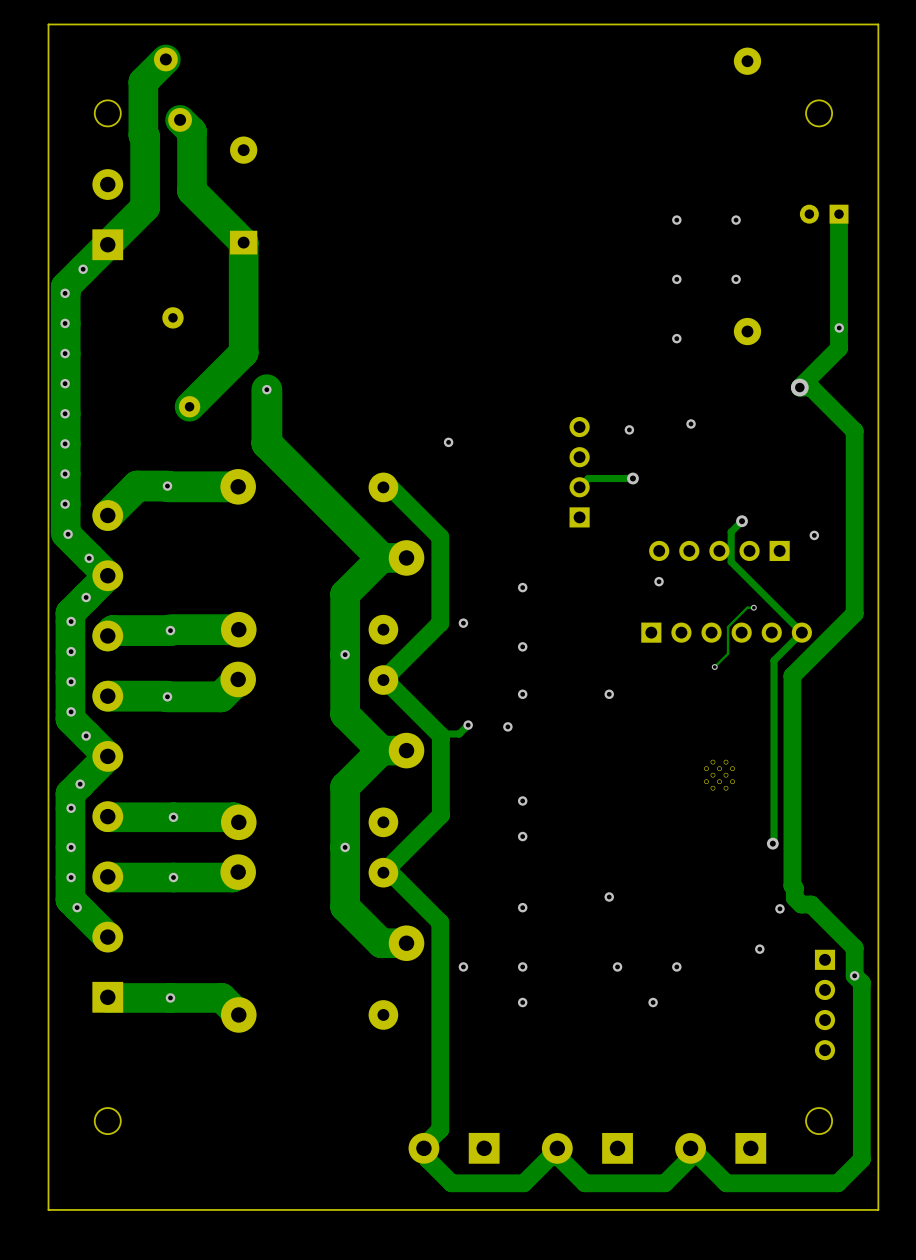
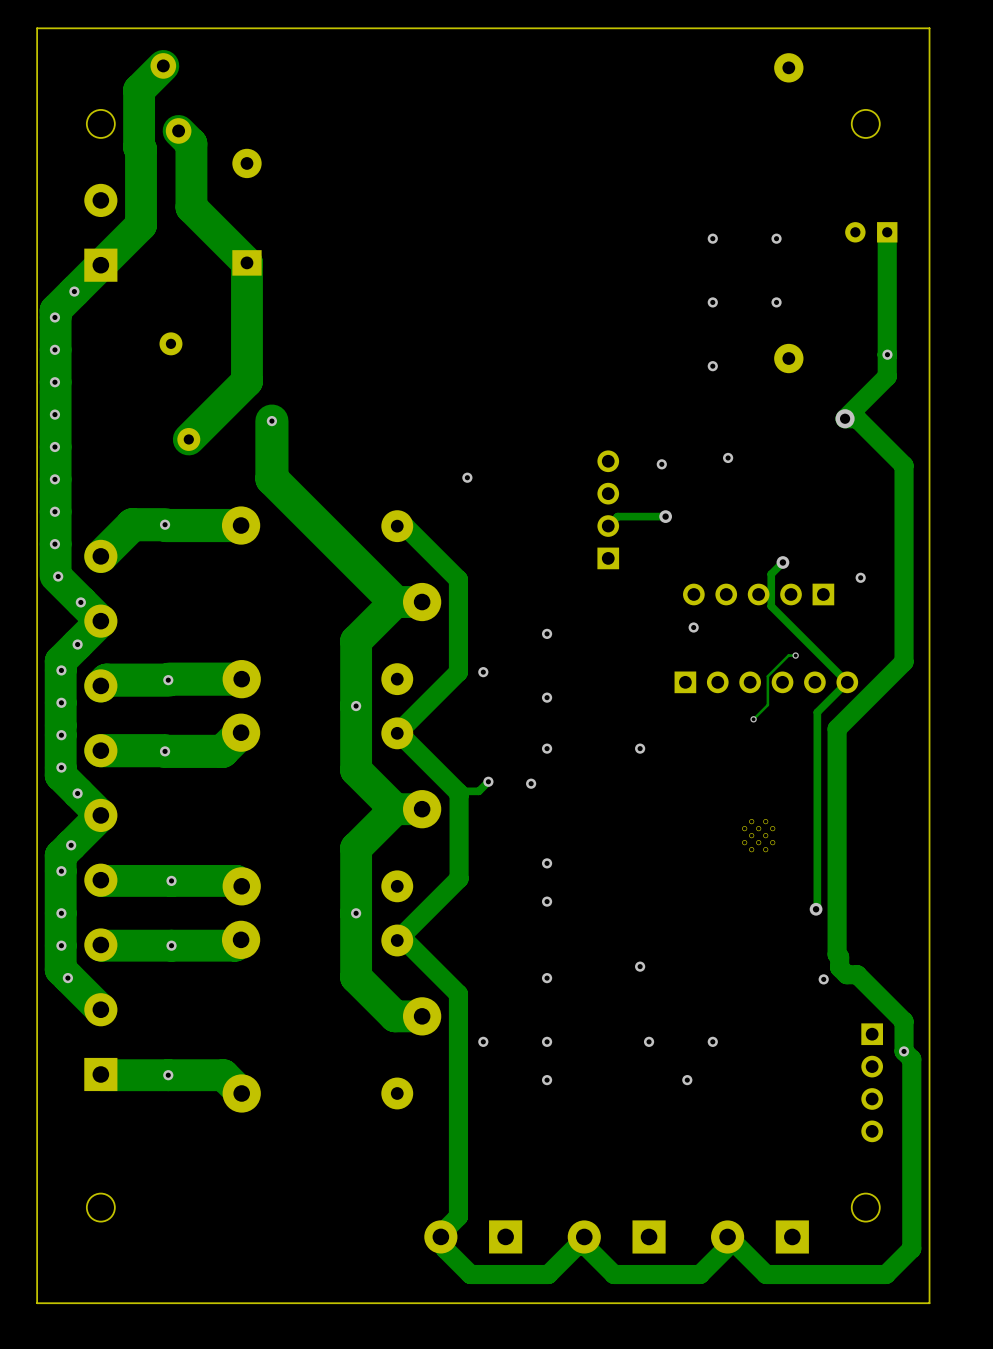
via: (759, 949) -> none

